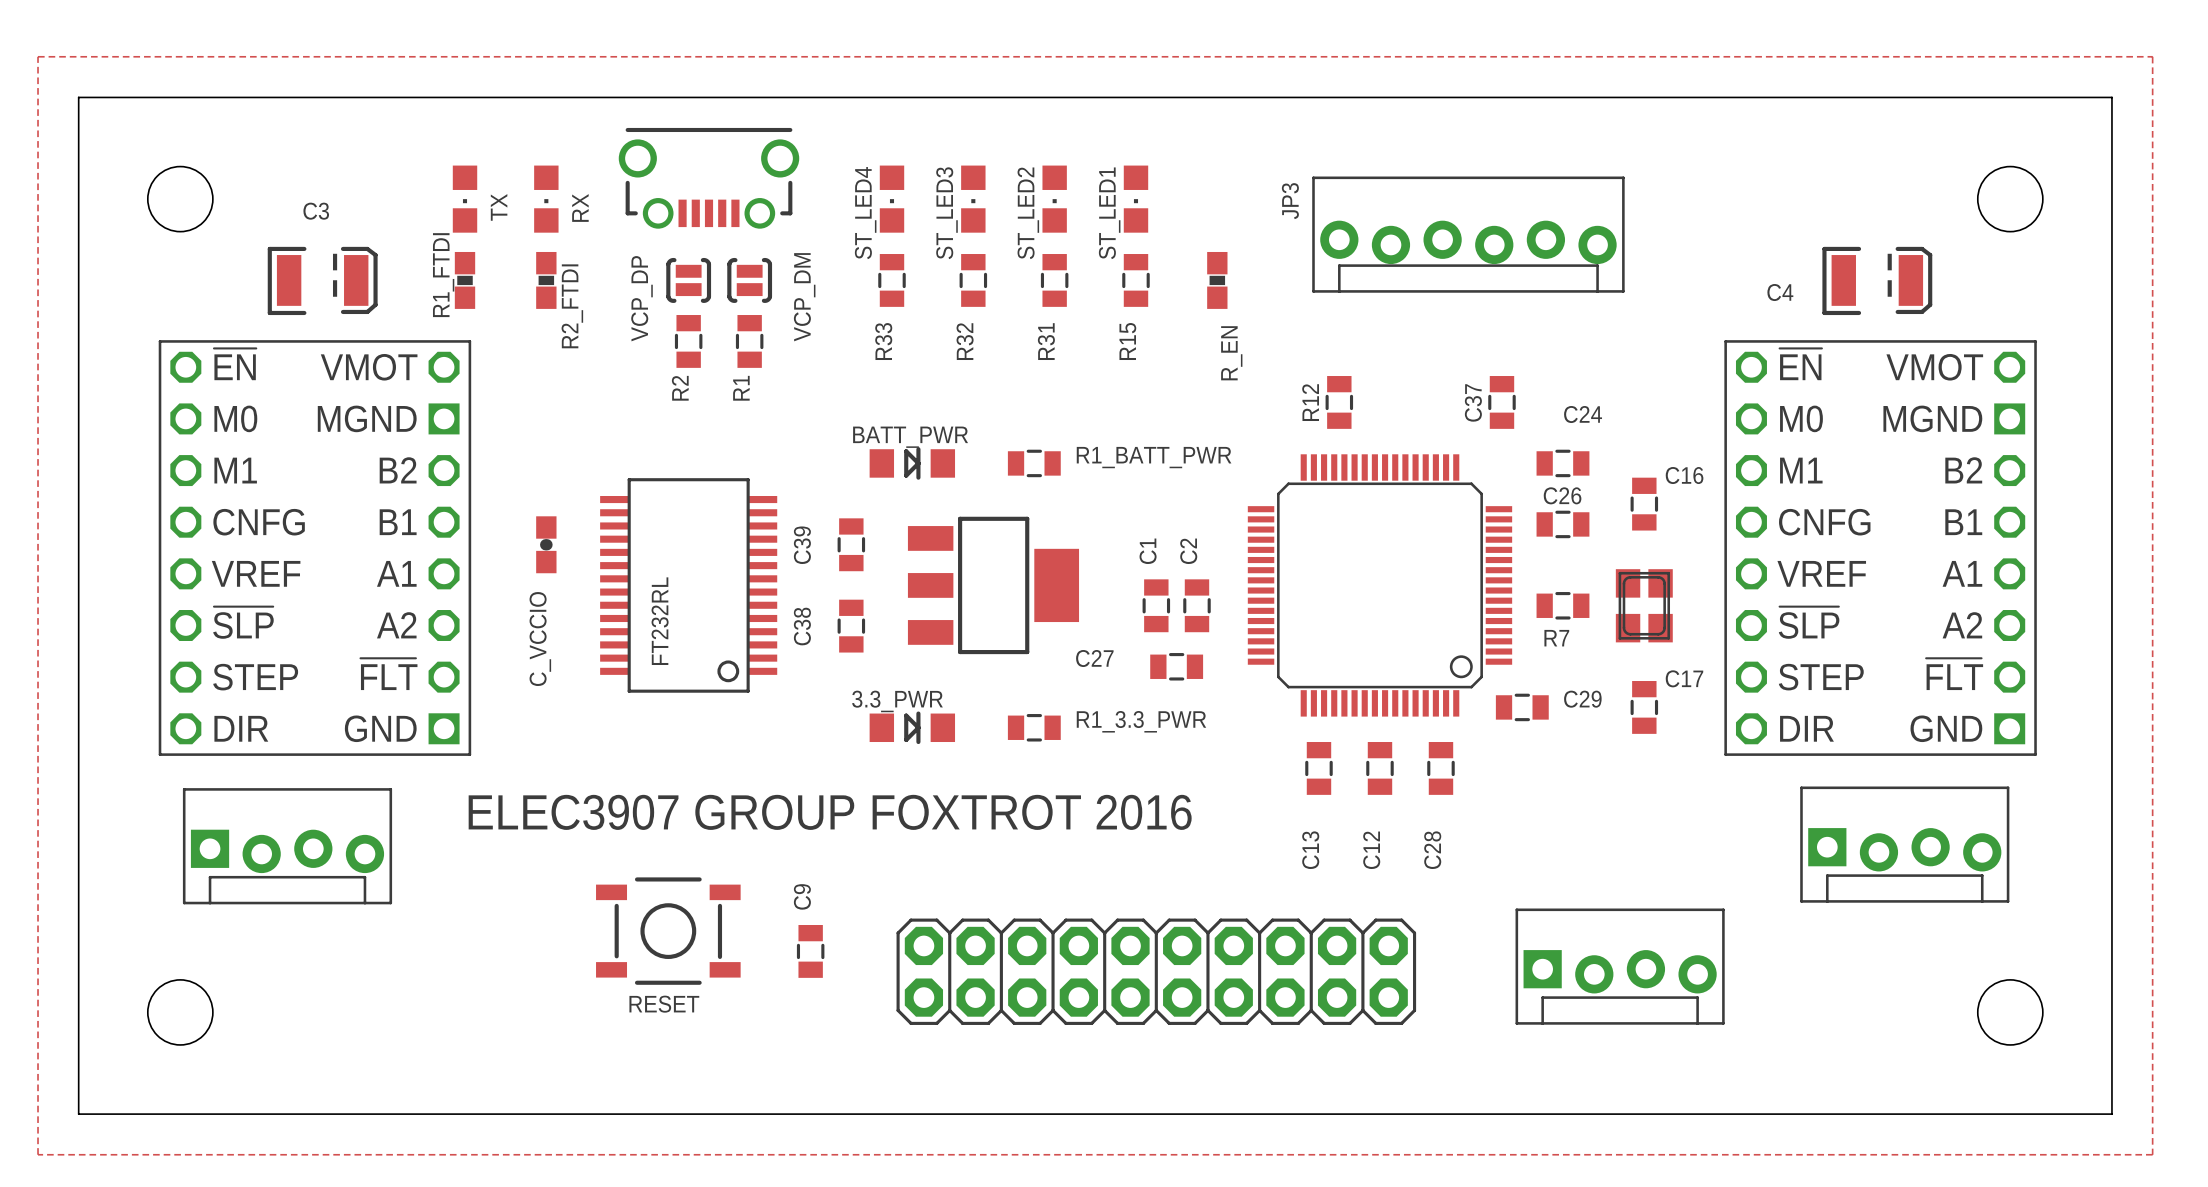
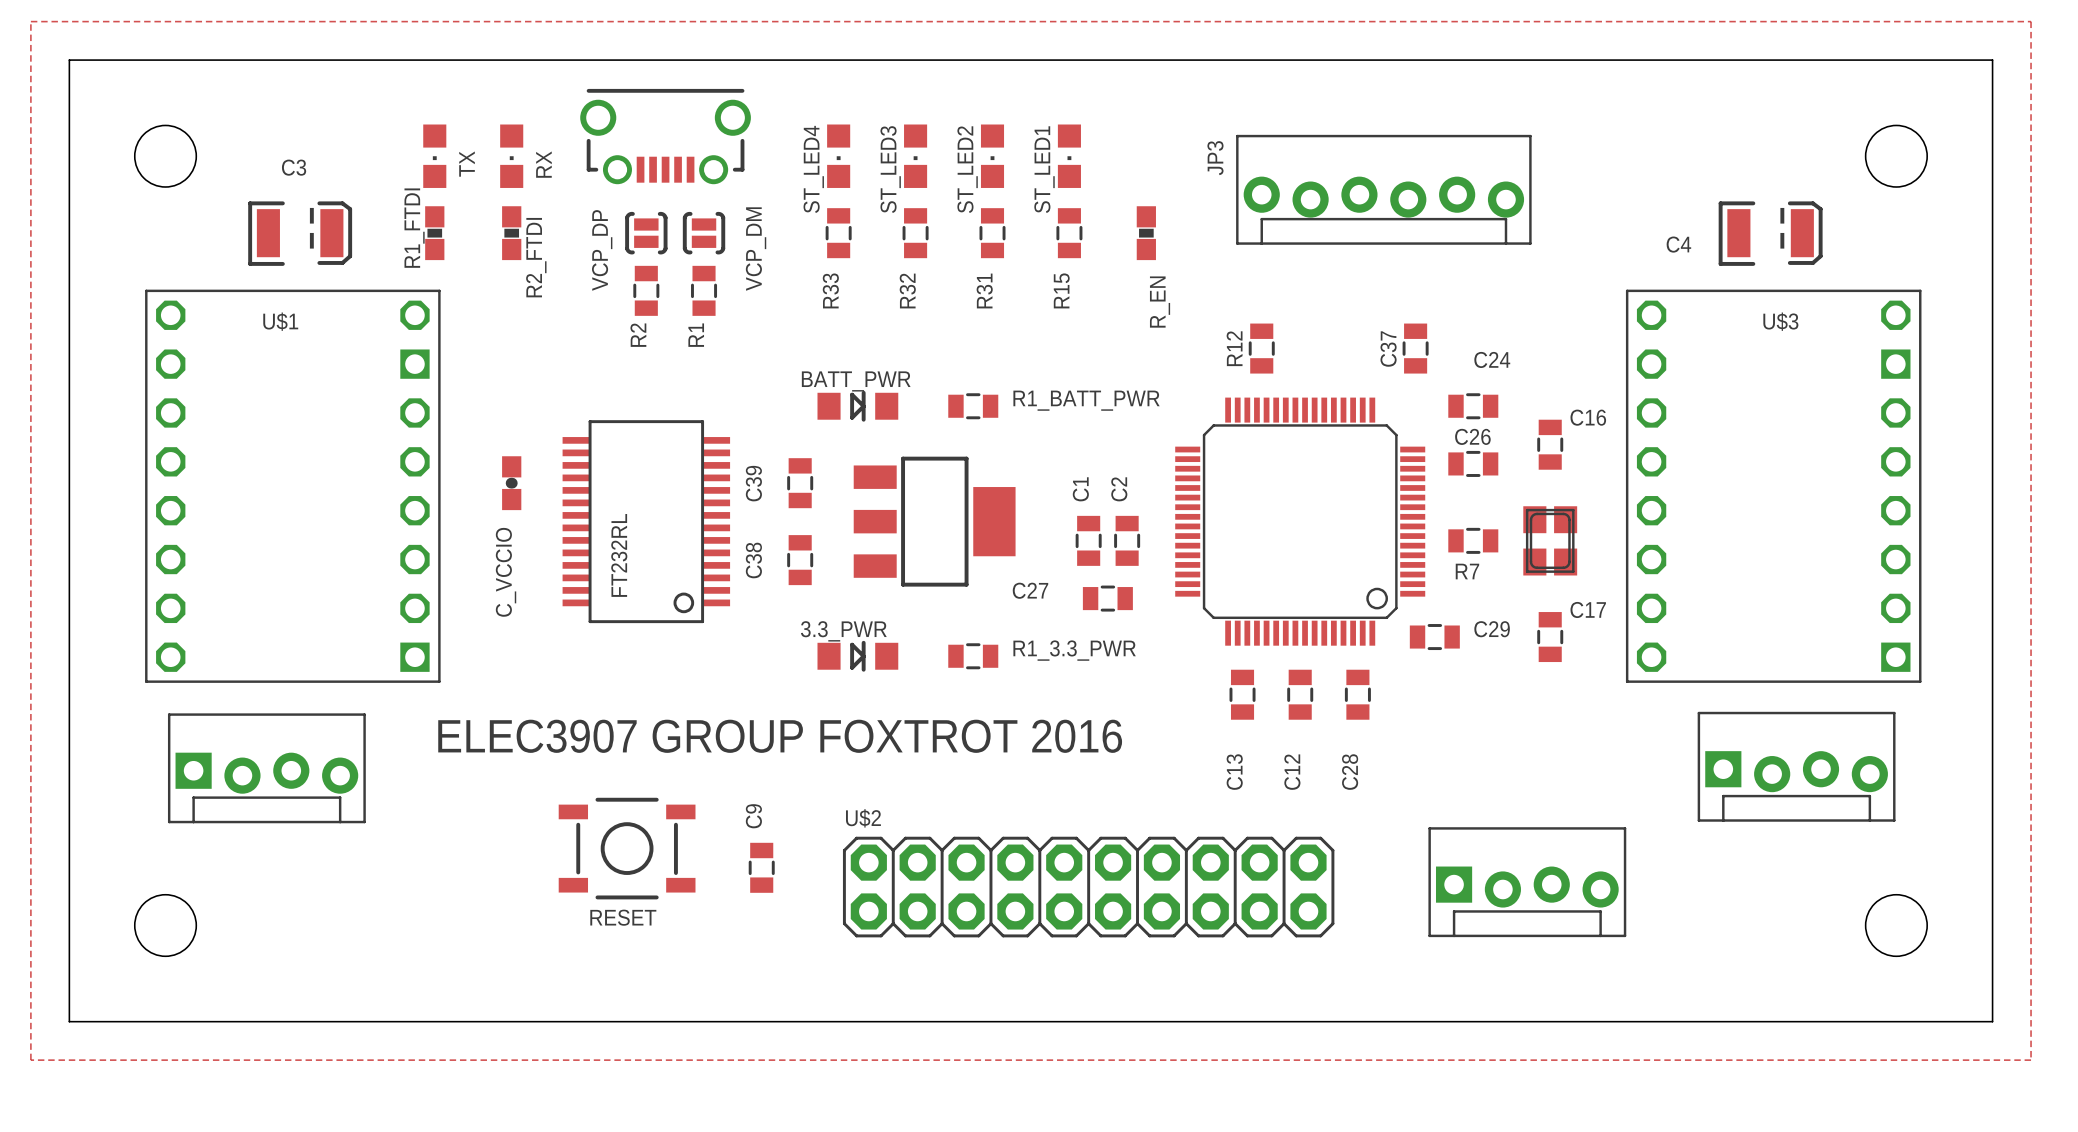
U$1 footprint: [158, 340, 472, 756] -> [145, 289, 441, 683]
U$3 footprint: [1724, 340, 2037, 756] -> [1625, 289, 1922, 683]
U$1 name: none -> U$1 (280, 321)
U$3 name: none -> U$3 (1780, 321)
U$2 name: none -> U$2 (863, 818)

